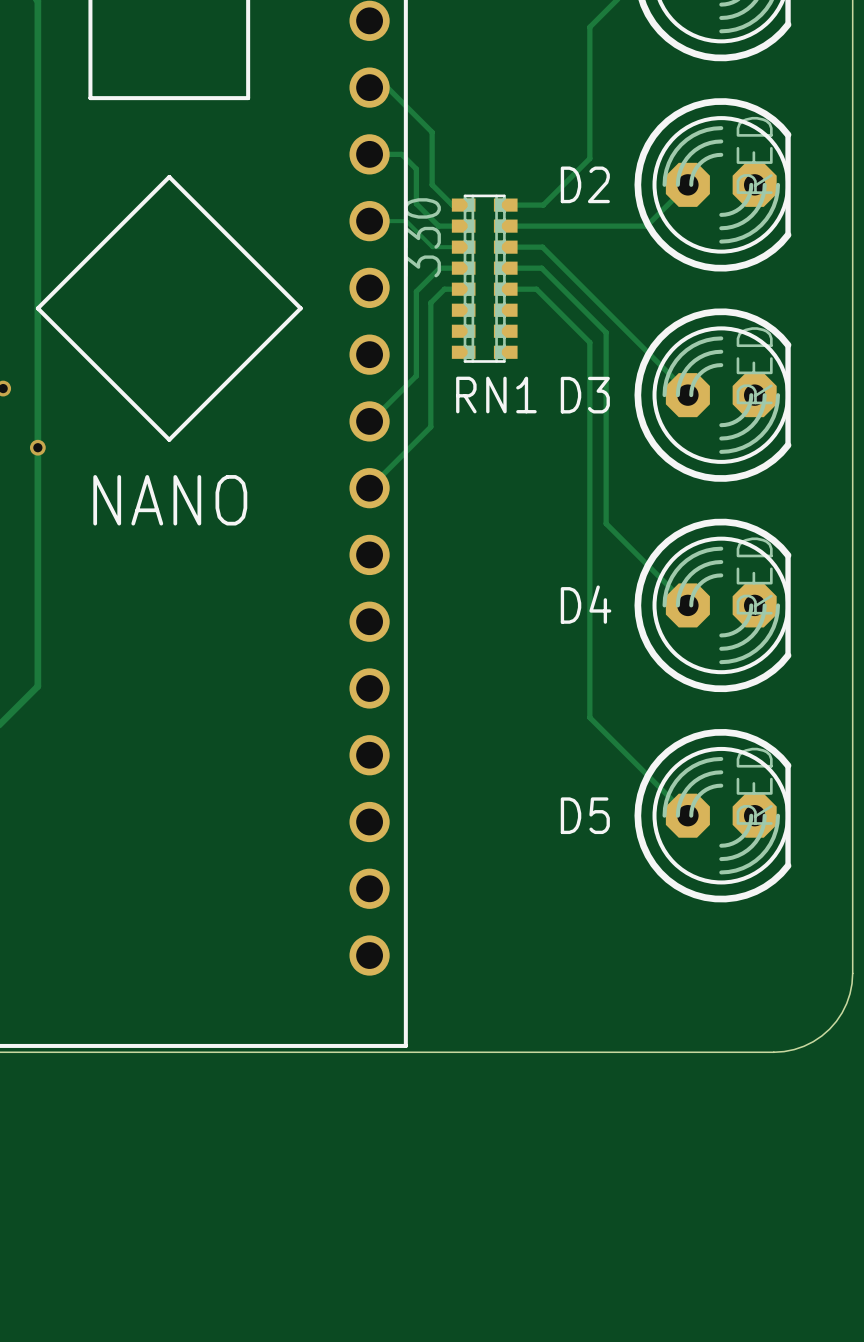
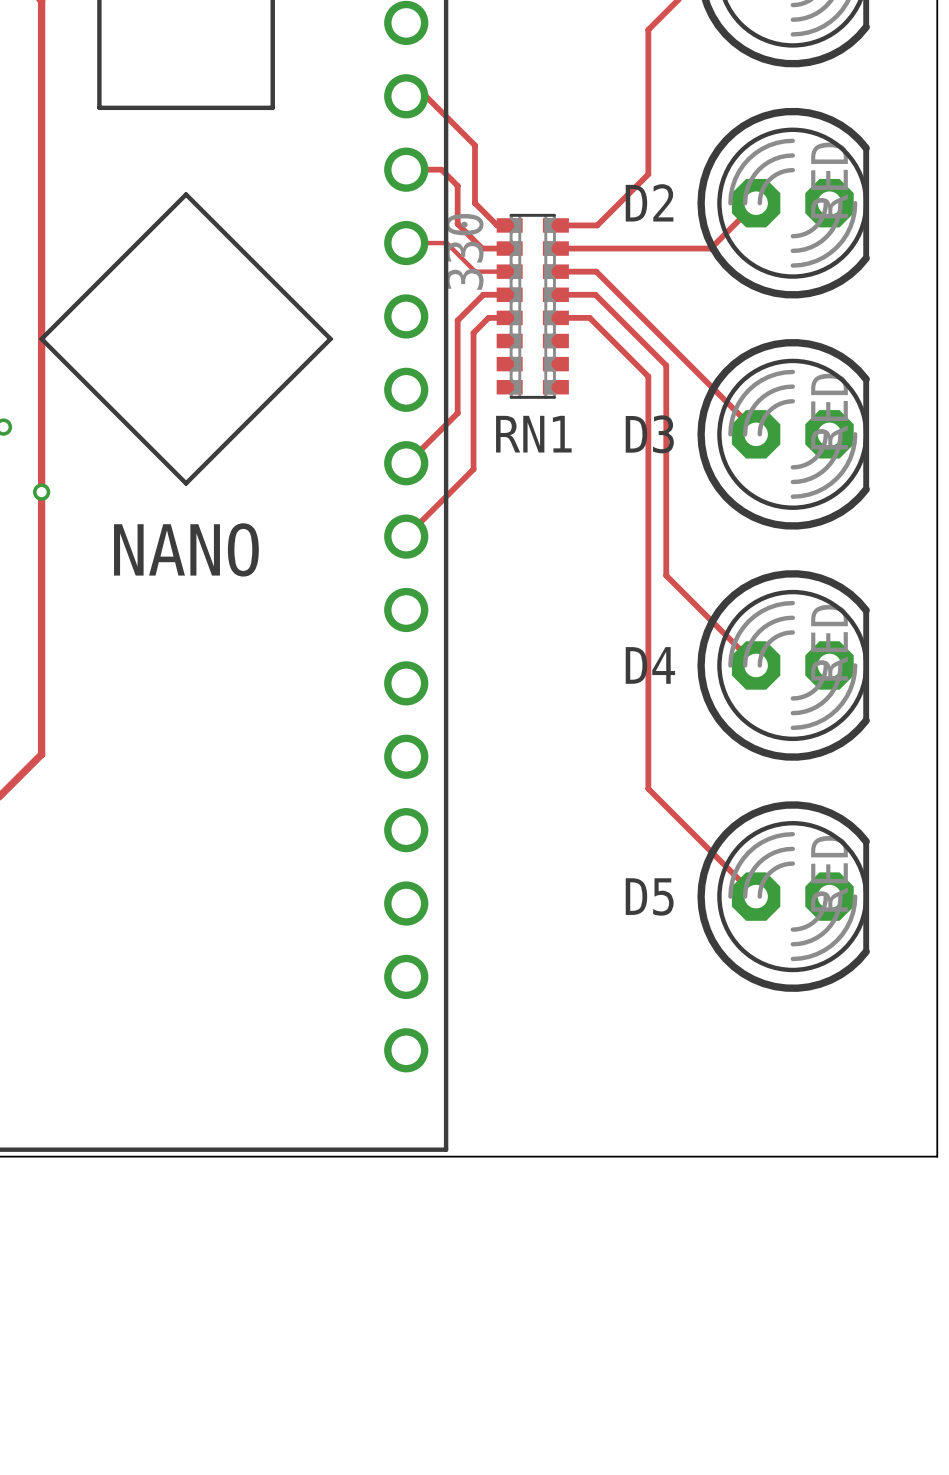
board edge: (852, 973) (846, 1003) (829, 1029) (804, 1046) (773, 1052) -> (937, 1069) (937, 1156) (850, 1156)

